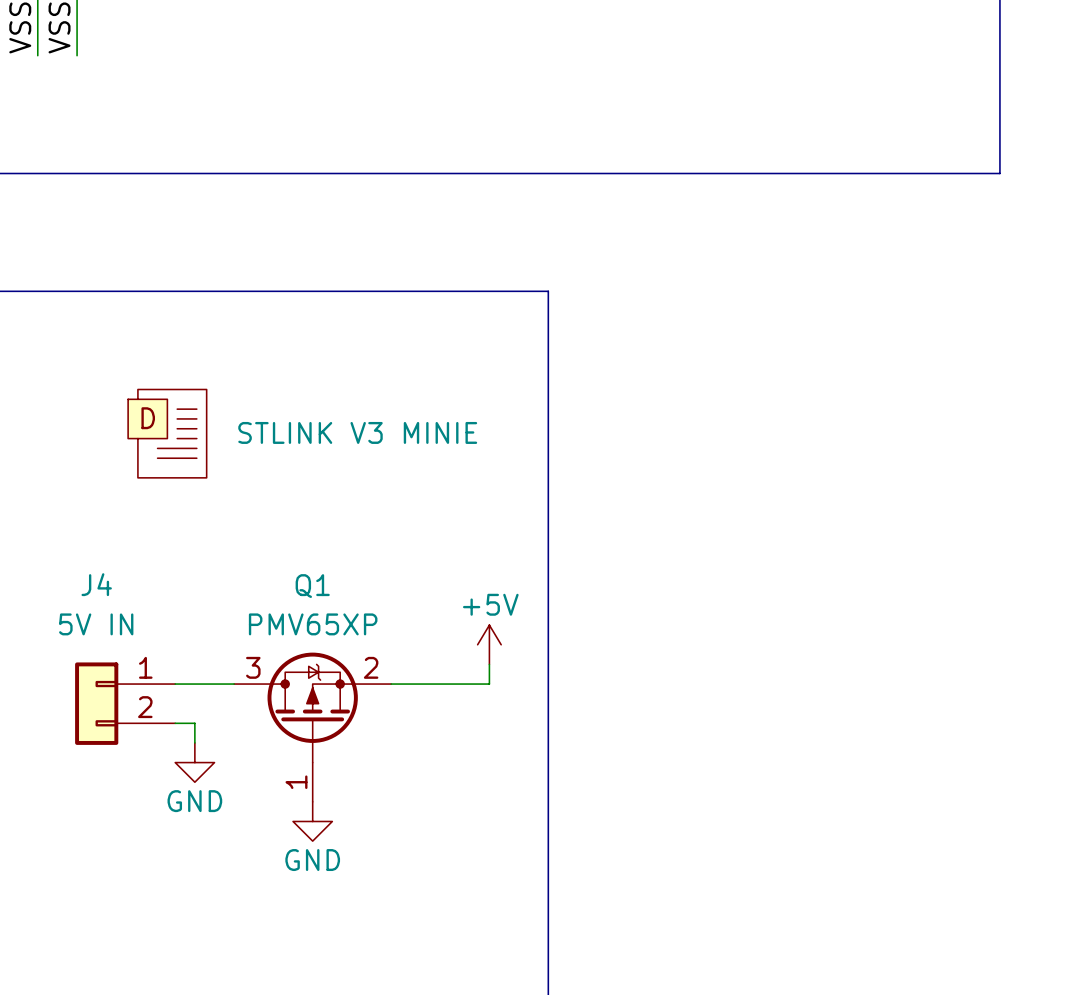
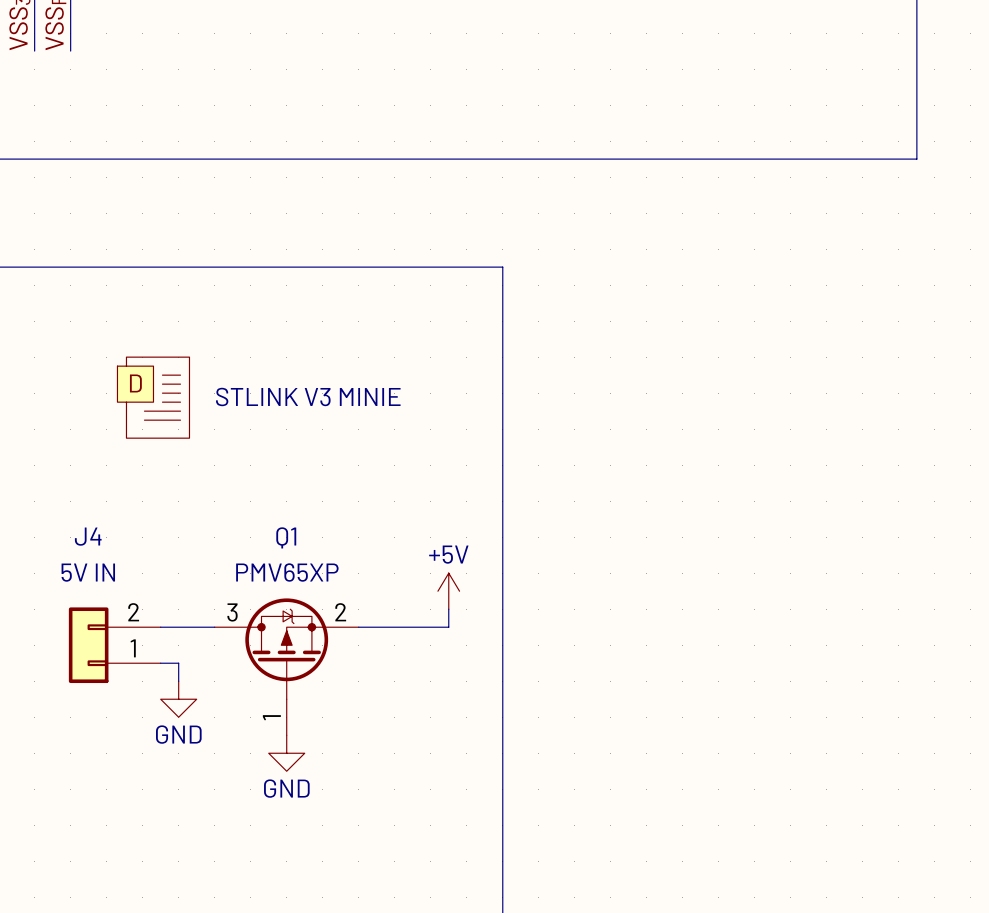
J4 flip: as is (96, 703) -> up-down (88, 645)

